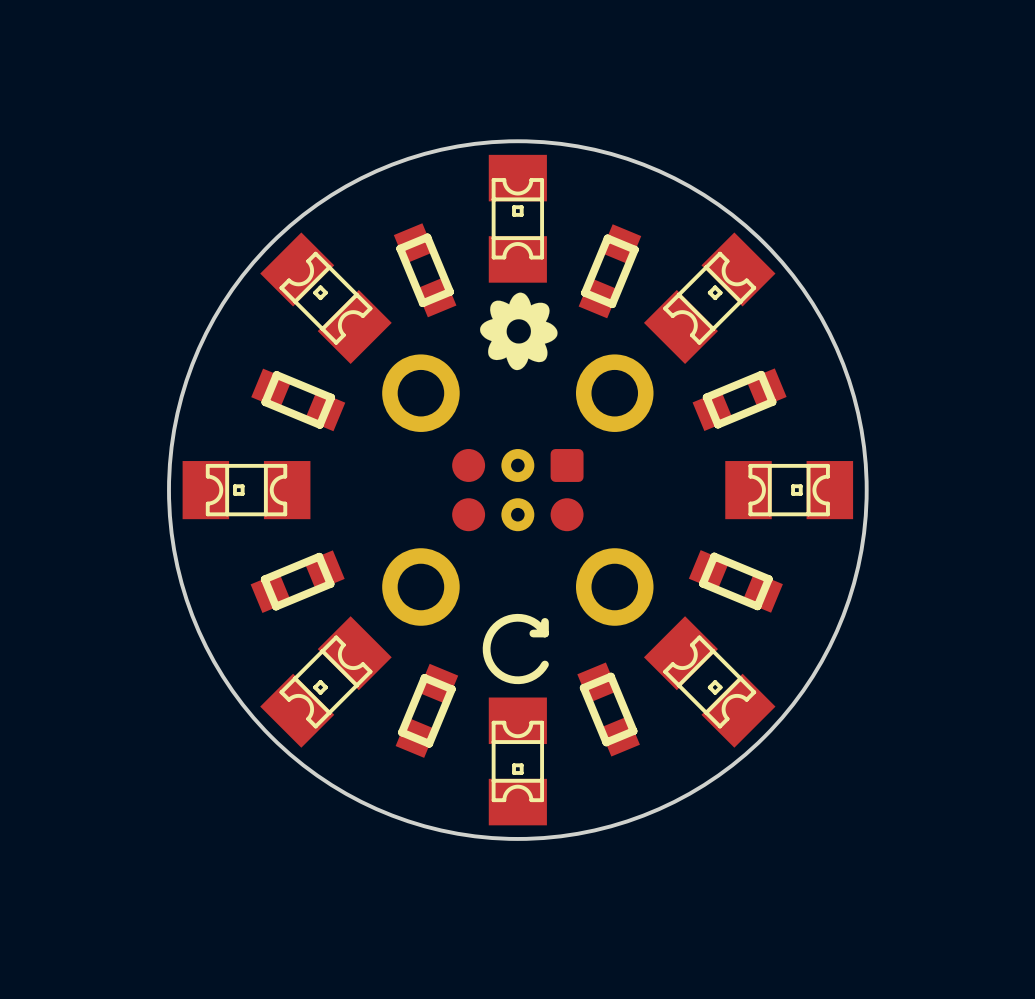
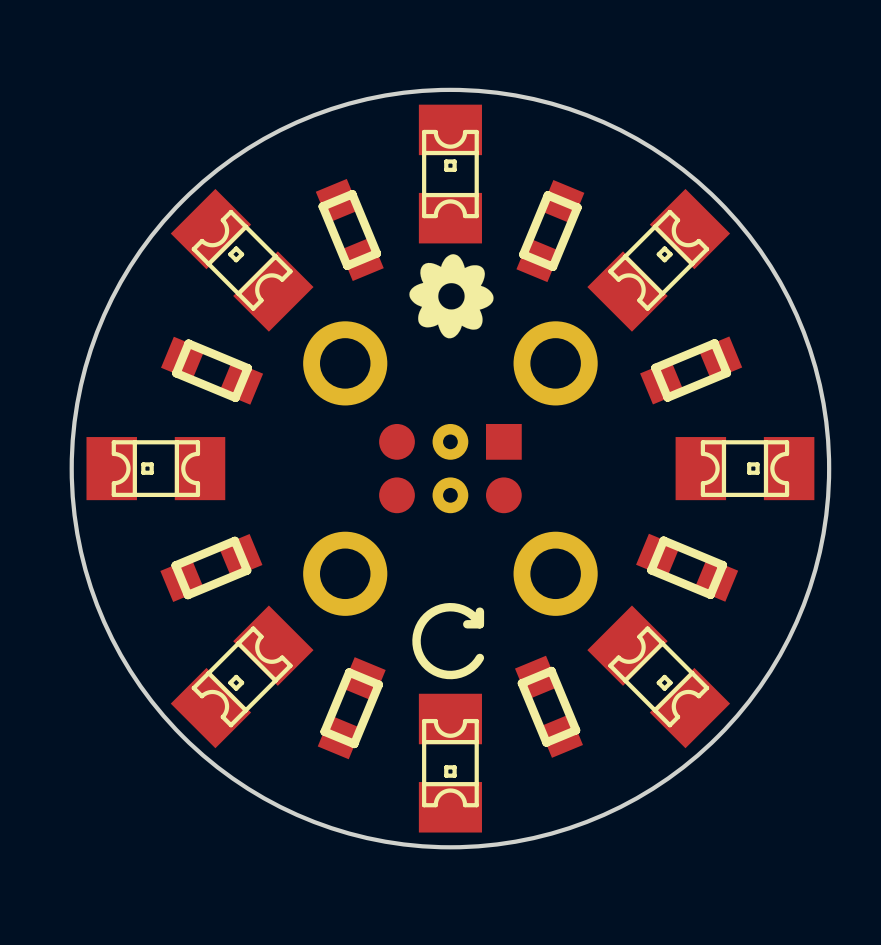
part footprint: [452, 449, 584, 532] -> [379, 423, 522, 514]

